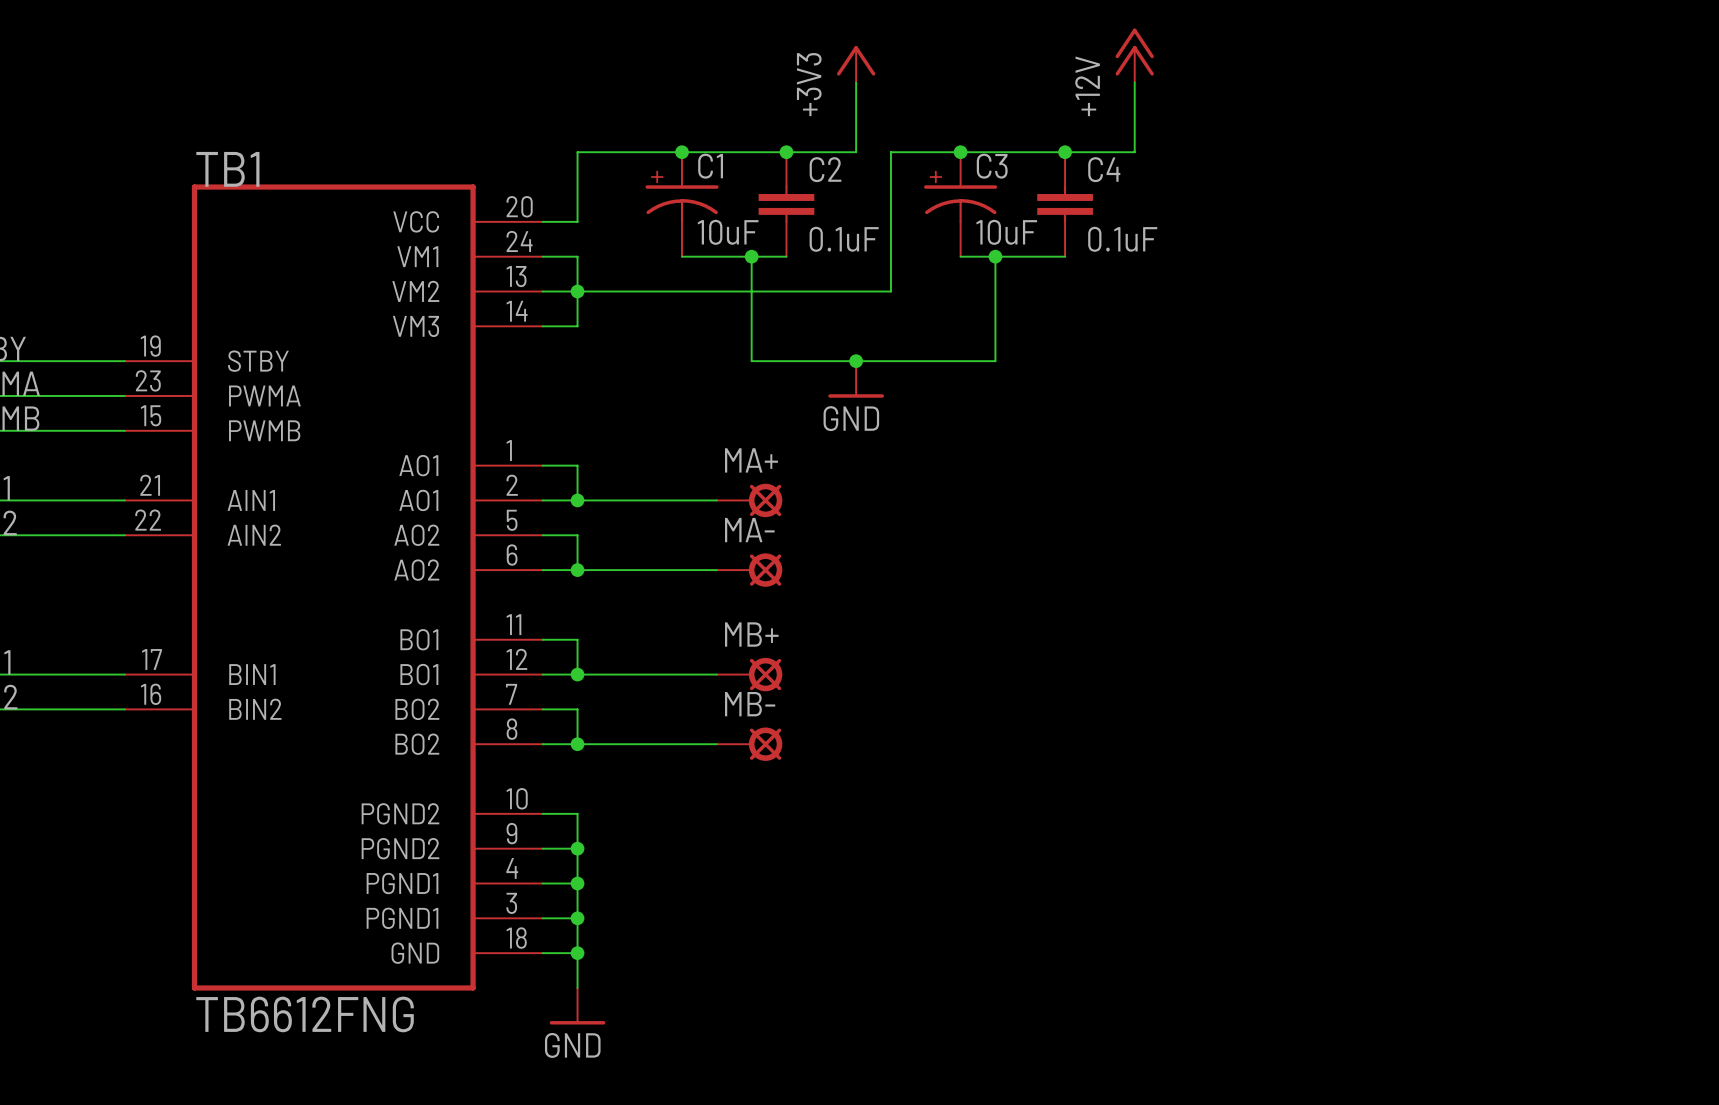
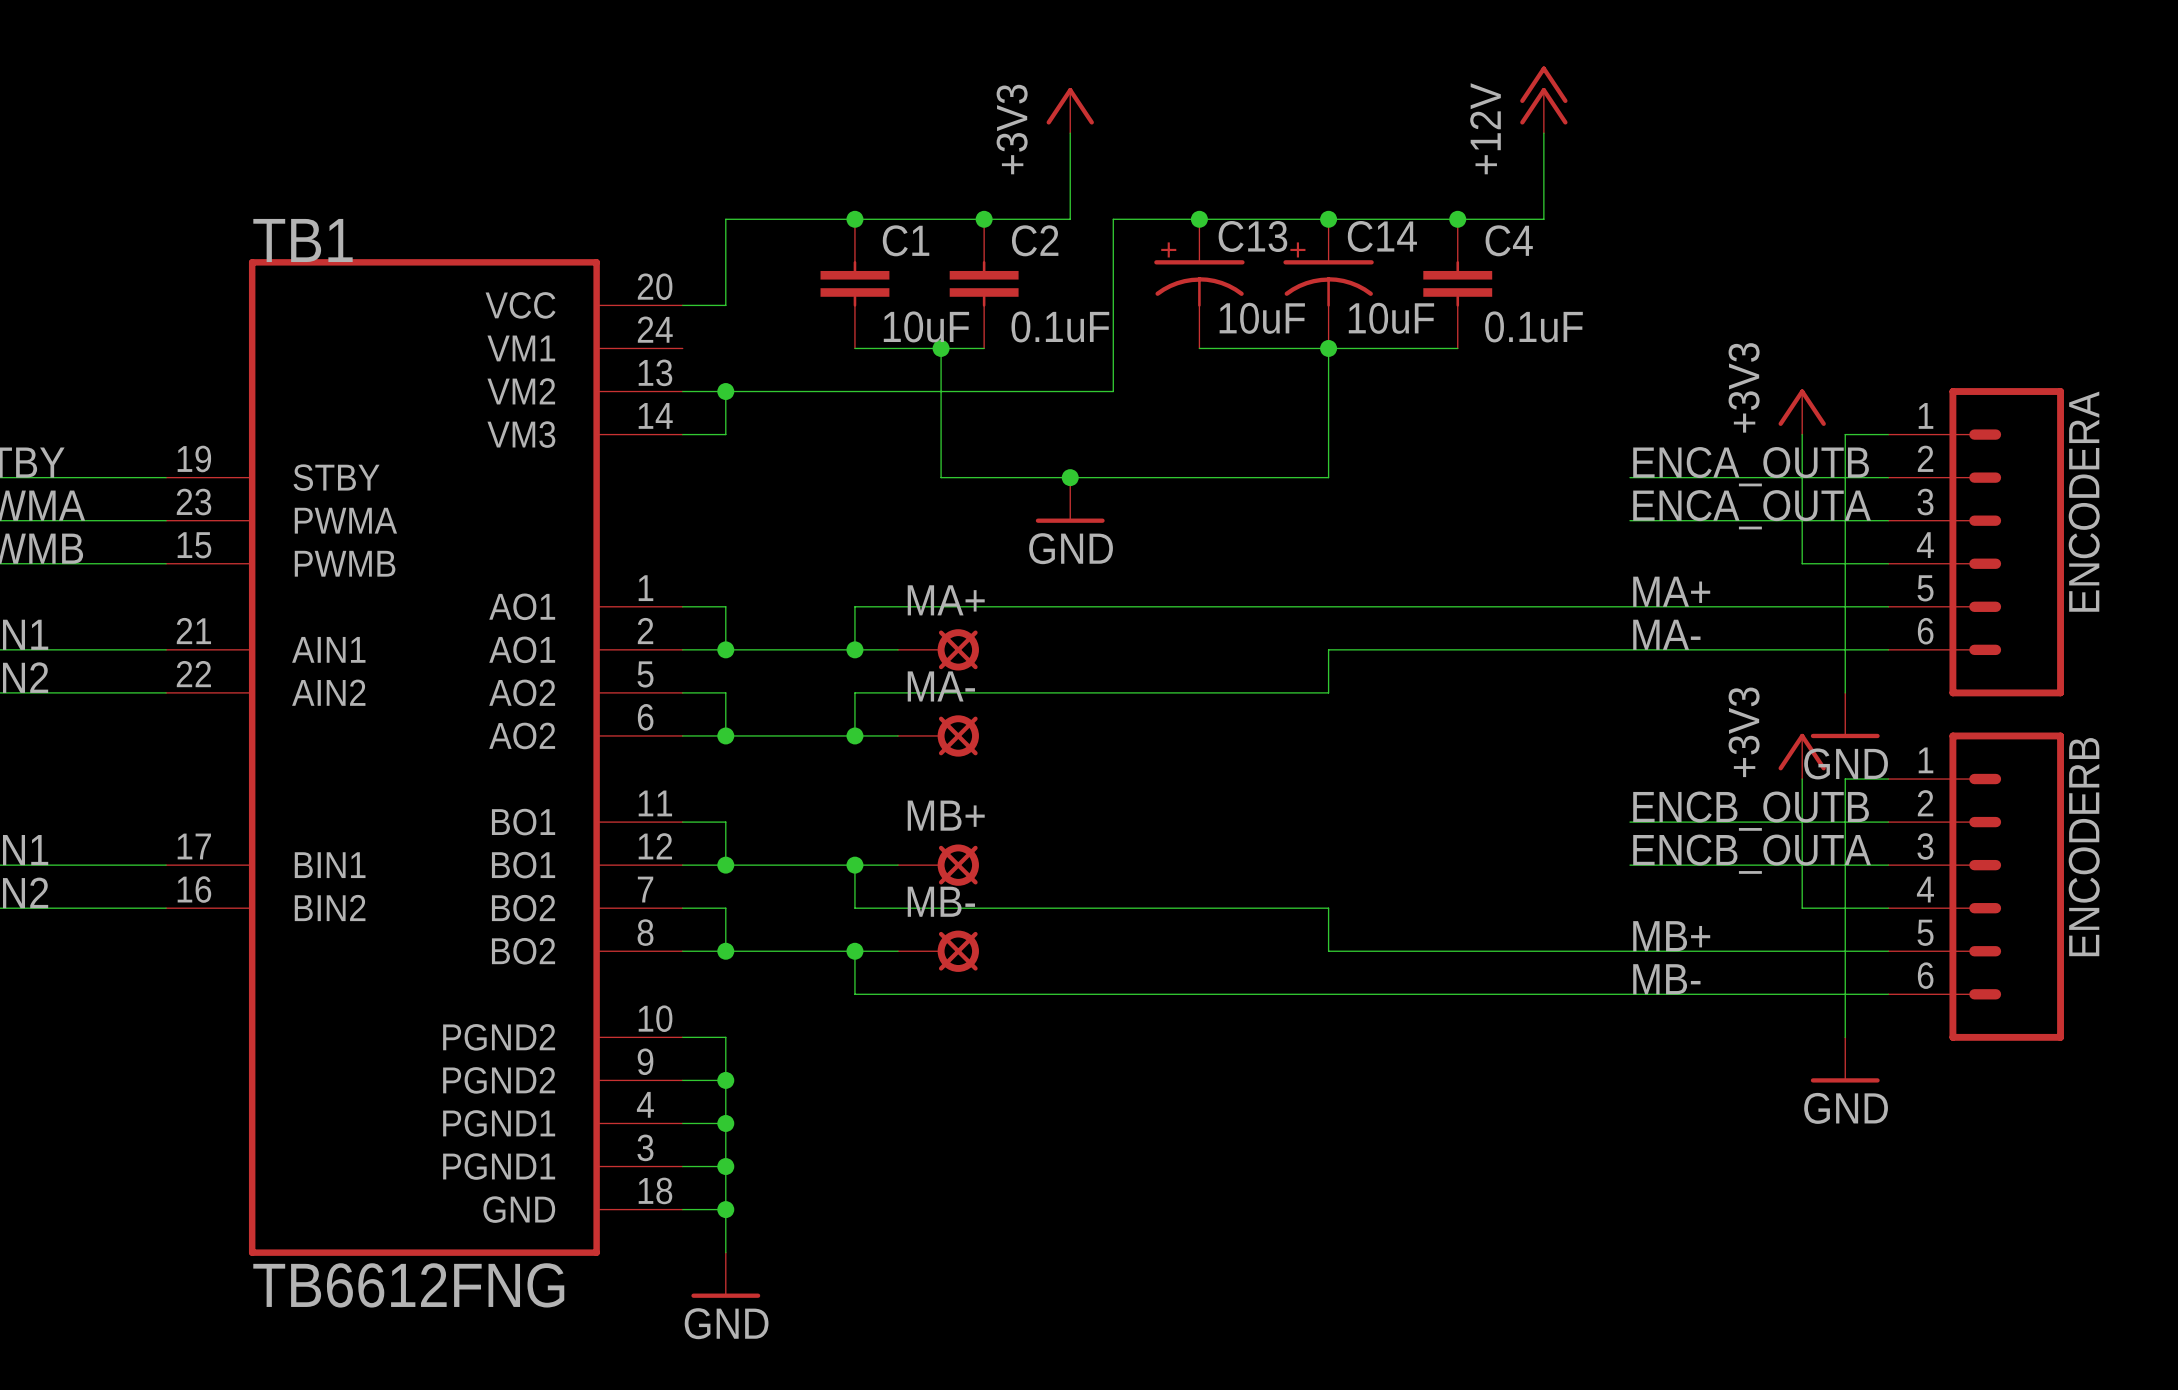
power symbol position: +12V (1134, 55) -> +12V (1543, 99)
wire: (1134, 82) (1134, 152) -> (1543, 133) (1543, 219) (1414, 219)
C1 symbol: [645, 152, 719, 257] -> [820, 219, 890, 349]
junction: none -> (1457, 219)
C3 name: C3 (992, 166) -> C13 (1252, 236)
C4 position: (1065, 204) -> (1457, 283)
C14: none -> 10uF (1328, 283)
wire: (542, 256) (577, 256) (577, 291) -> none
wire: (995, 256) (995, 361) -> (1457, 348) (1328, 348) (1328, 477) (1242, 477)
junction position: (995, 256) -> (1328, 348)
power symbol: none -> +3V3 (1802, 411)
wire: none -> (1802, 434) (1802, 563) (1888, 563)
wire: none -> (1888, 434) (1845, 434) (1845, 692)
label: none -> ENCA_OUTB (1751, 466)
wire: none -> (1629, 477) (1888, 477)
label: none -> ENCA_OUTA (1752, 509)
wire: none -> (1629, 520) (1888, 520)
ENCODERA: none -> (1976, 542)
label: none -> MA+ (1671, 591)
wire: none -> (1888, 606) (854, 606) (854, 649)
label: none -> MA- (1666, 634)
junction: none -> (854, 649)
wire: none -> (1888, 649) (1328, 649) (1328, 692) (854, 692) (854, 735)
power symbol: none -> GND (1845, 715)
junction: none -> (854, 735)
power symbol: none -> +3V3 (1802, 756)
wire: none -> (1802, 779) (1802, 908) (1888, 908)
wire: none -> (1888, 779) (1845, 779) (1845, 1037)
label: none -> ENCB_OUTB (1751, 811)
wire: none -> (1629, 822) (1888, 822)
label: none -> ENCB_OUTA (1752, 854)
wire: none -> (854, 865) (854, 908) (1328, 908) (1328, 951) (1888, 951)
junction: none -> (854, 865)
wire: none -> (1629, 865) (1888, 865)
ENCODERB: none -> (1976, 886)
label: none -> MB+ (1671, 936)
wire: none -> (854, 951) (854, 994) (1888, 994)
junction: none -> (854, 951)
label: none -> MB- (1666, 979)
power symbol: none -> GND (1845, 1059)

